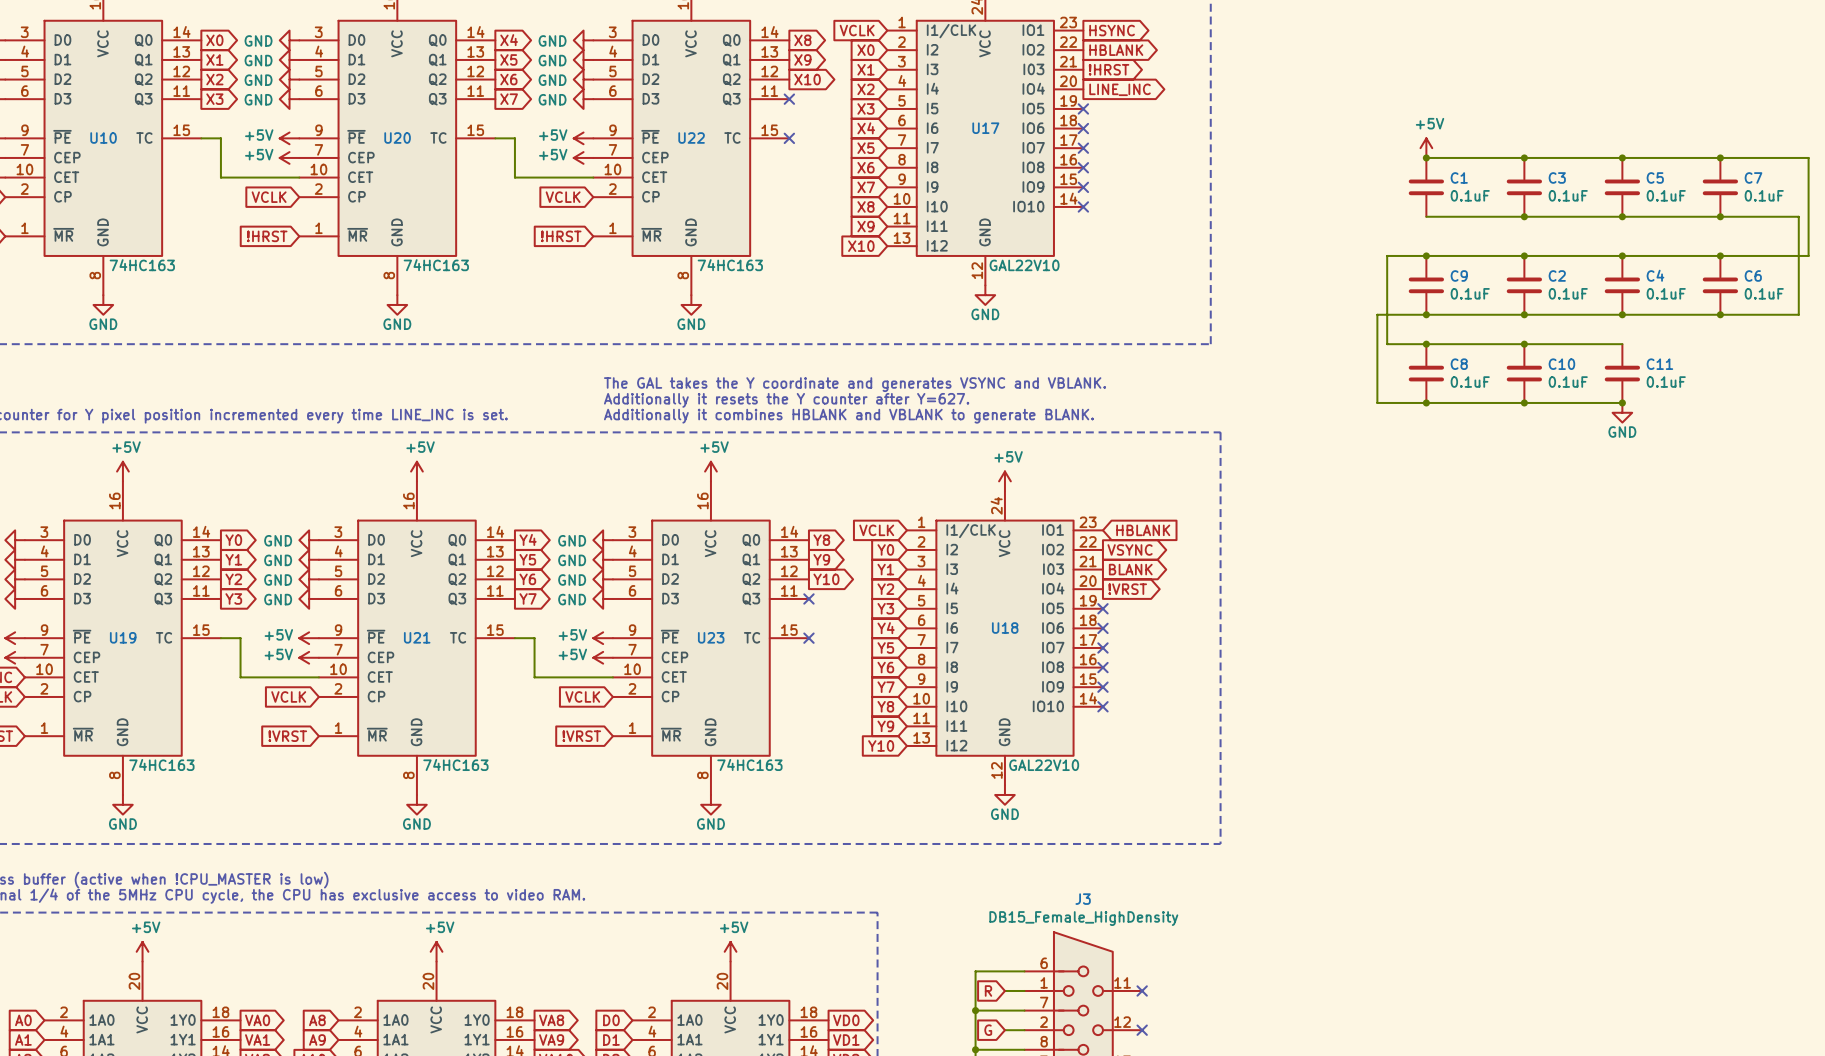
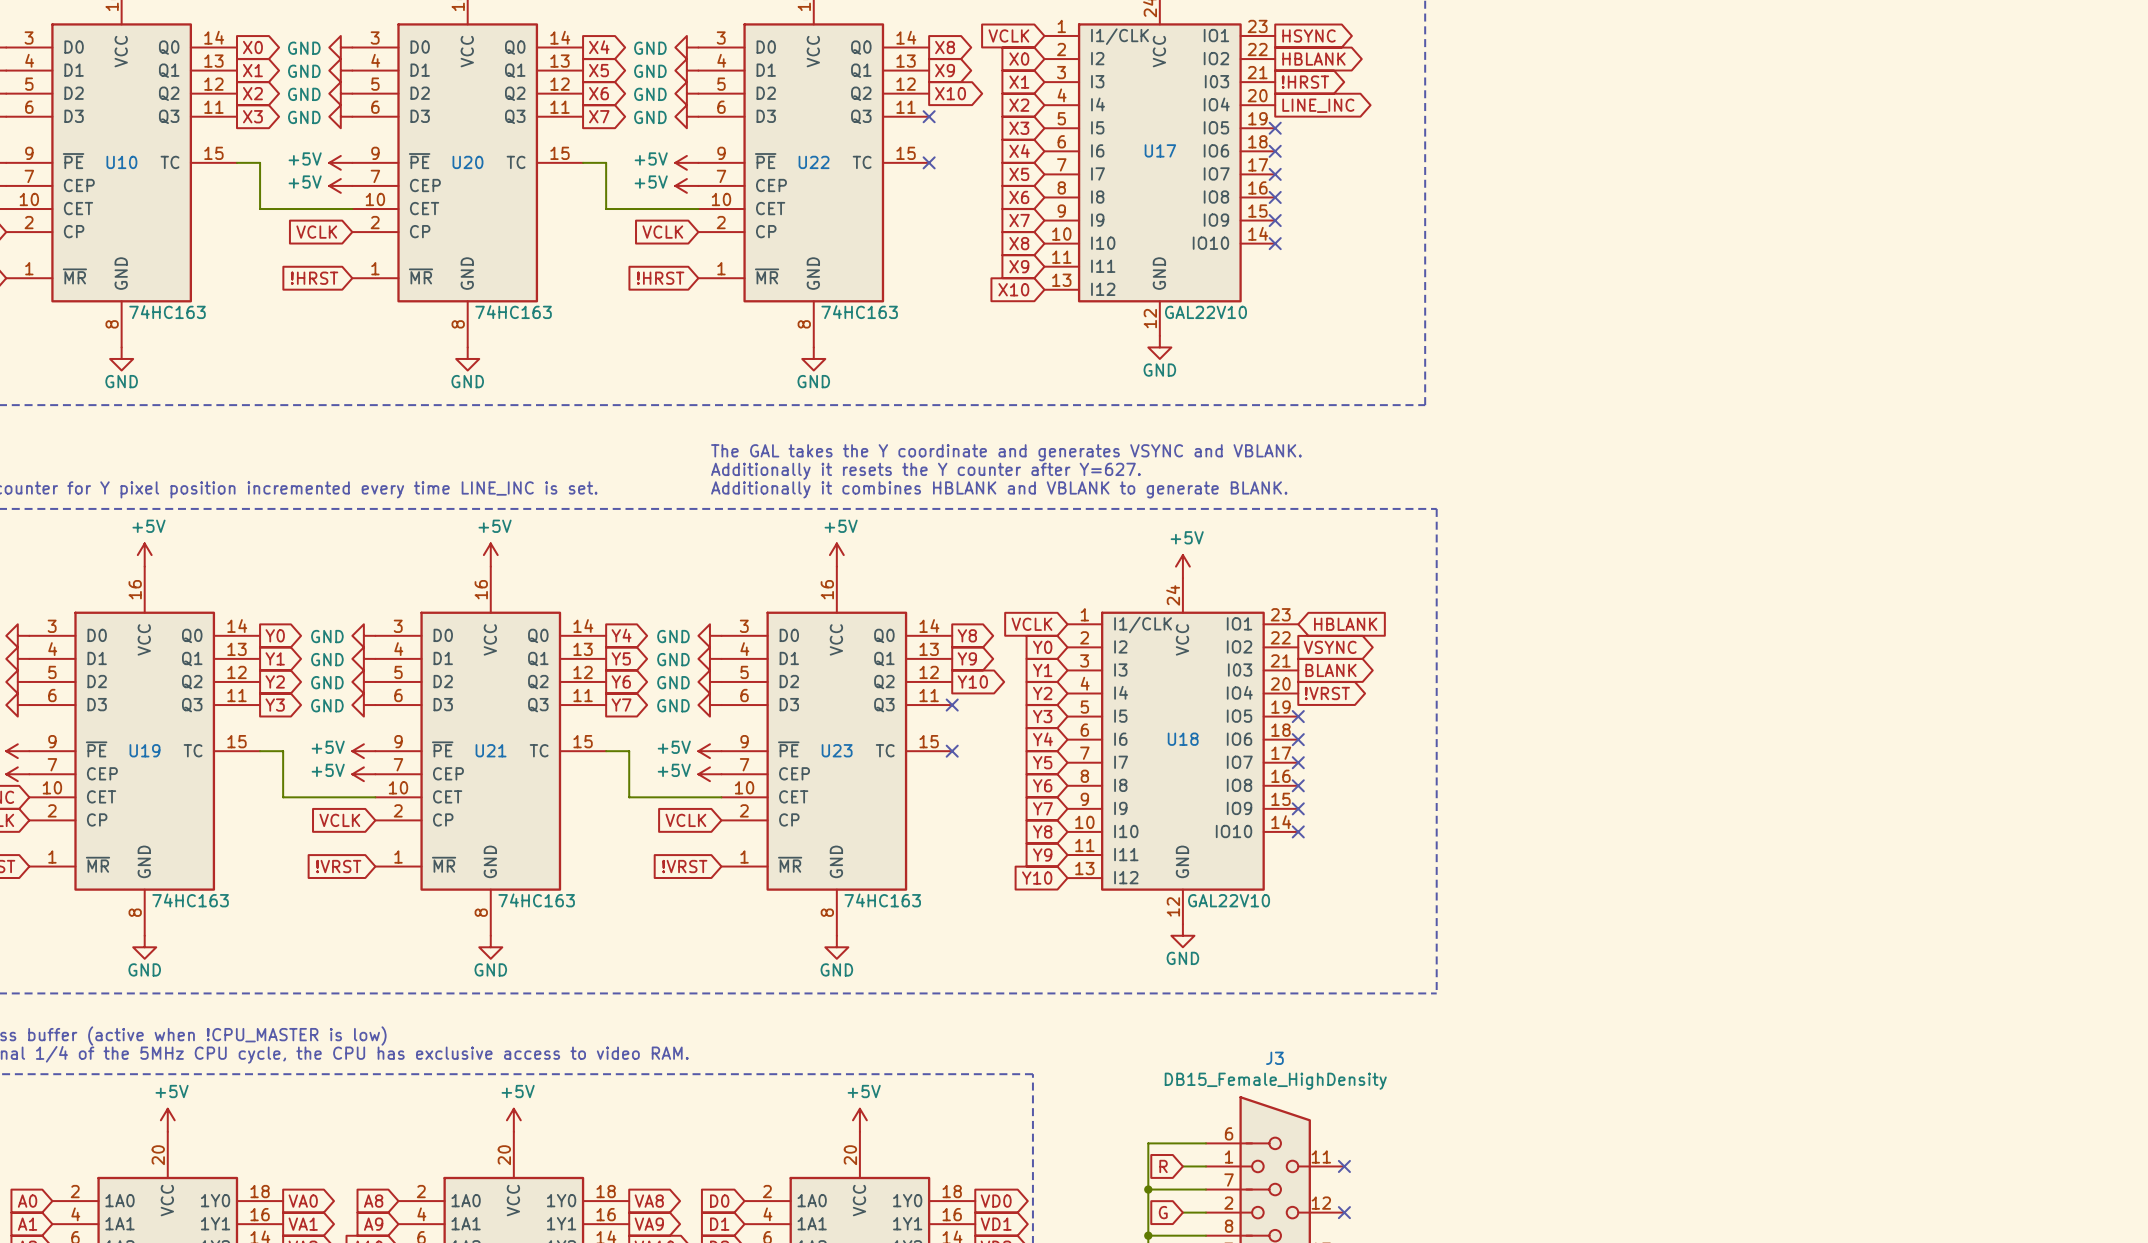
power symbol: +5V (1426, 148) -> none
wire: (1426, 157) (1808, 157) (1808, 255) (1387, 255) (1387, 344) (1622, 344) -> none
junction: (1426, 157) -> none
junction: (1524, 157) -> none
junction: (1622, 157) -> none
junction: (1720, 157) -> none
C1: 0.1uF (1426, 187) -> none
C3: 0.1uF (1524, 187) -> none
C5: 0.1uF (1622, 187) -> none
C7: 0.1uF (1720, 187) -> none
wire: (1426, 216) (1798, 216) (1798, 314) (1377, 314) (1377, 402) (1622, 402) -> none
junction: (1524, 216) -> none
junction: (1622, 216) -> none
junction: (1720, 216) -> none
junction: (1426, 255) -> none
junction: (1524, 255) -> none
junction: (1622, 255) -> none
junction: (1720, 255) -> none
C9: 0.1uF (1426, 285) -> none
C2: 0.1uF (1524, 285) -> none
C4: 0.1uF (1622, 285) -> none
C6: 0.1uF (1720, 285) -> none
junction: (1426, 314) -> none
junction: (1524, 314) -> none
junction: (1622, 314) -> none
junction: (1720, 314) -> none
junction: (1426, 344) -> none
junction: (1524, 344) -> none
C8: 0.1uF (1426, 373) -> none
C10: 0.1uF (1524, 373) -> none
C11: 0.1uF (1622, 373) -> none
junction: (1426, 402) -> none
junction: (1524, 402) -> none
junction: (1622, 402) -> none
power symbol: GND (1622, 412) -> none

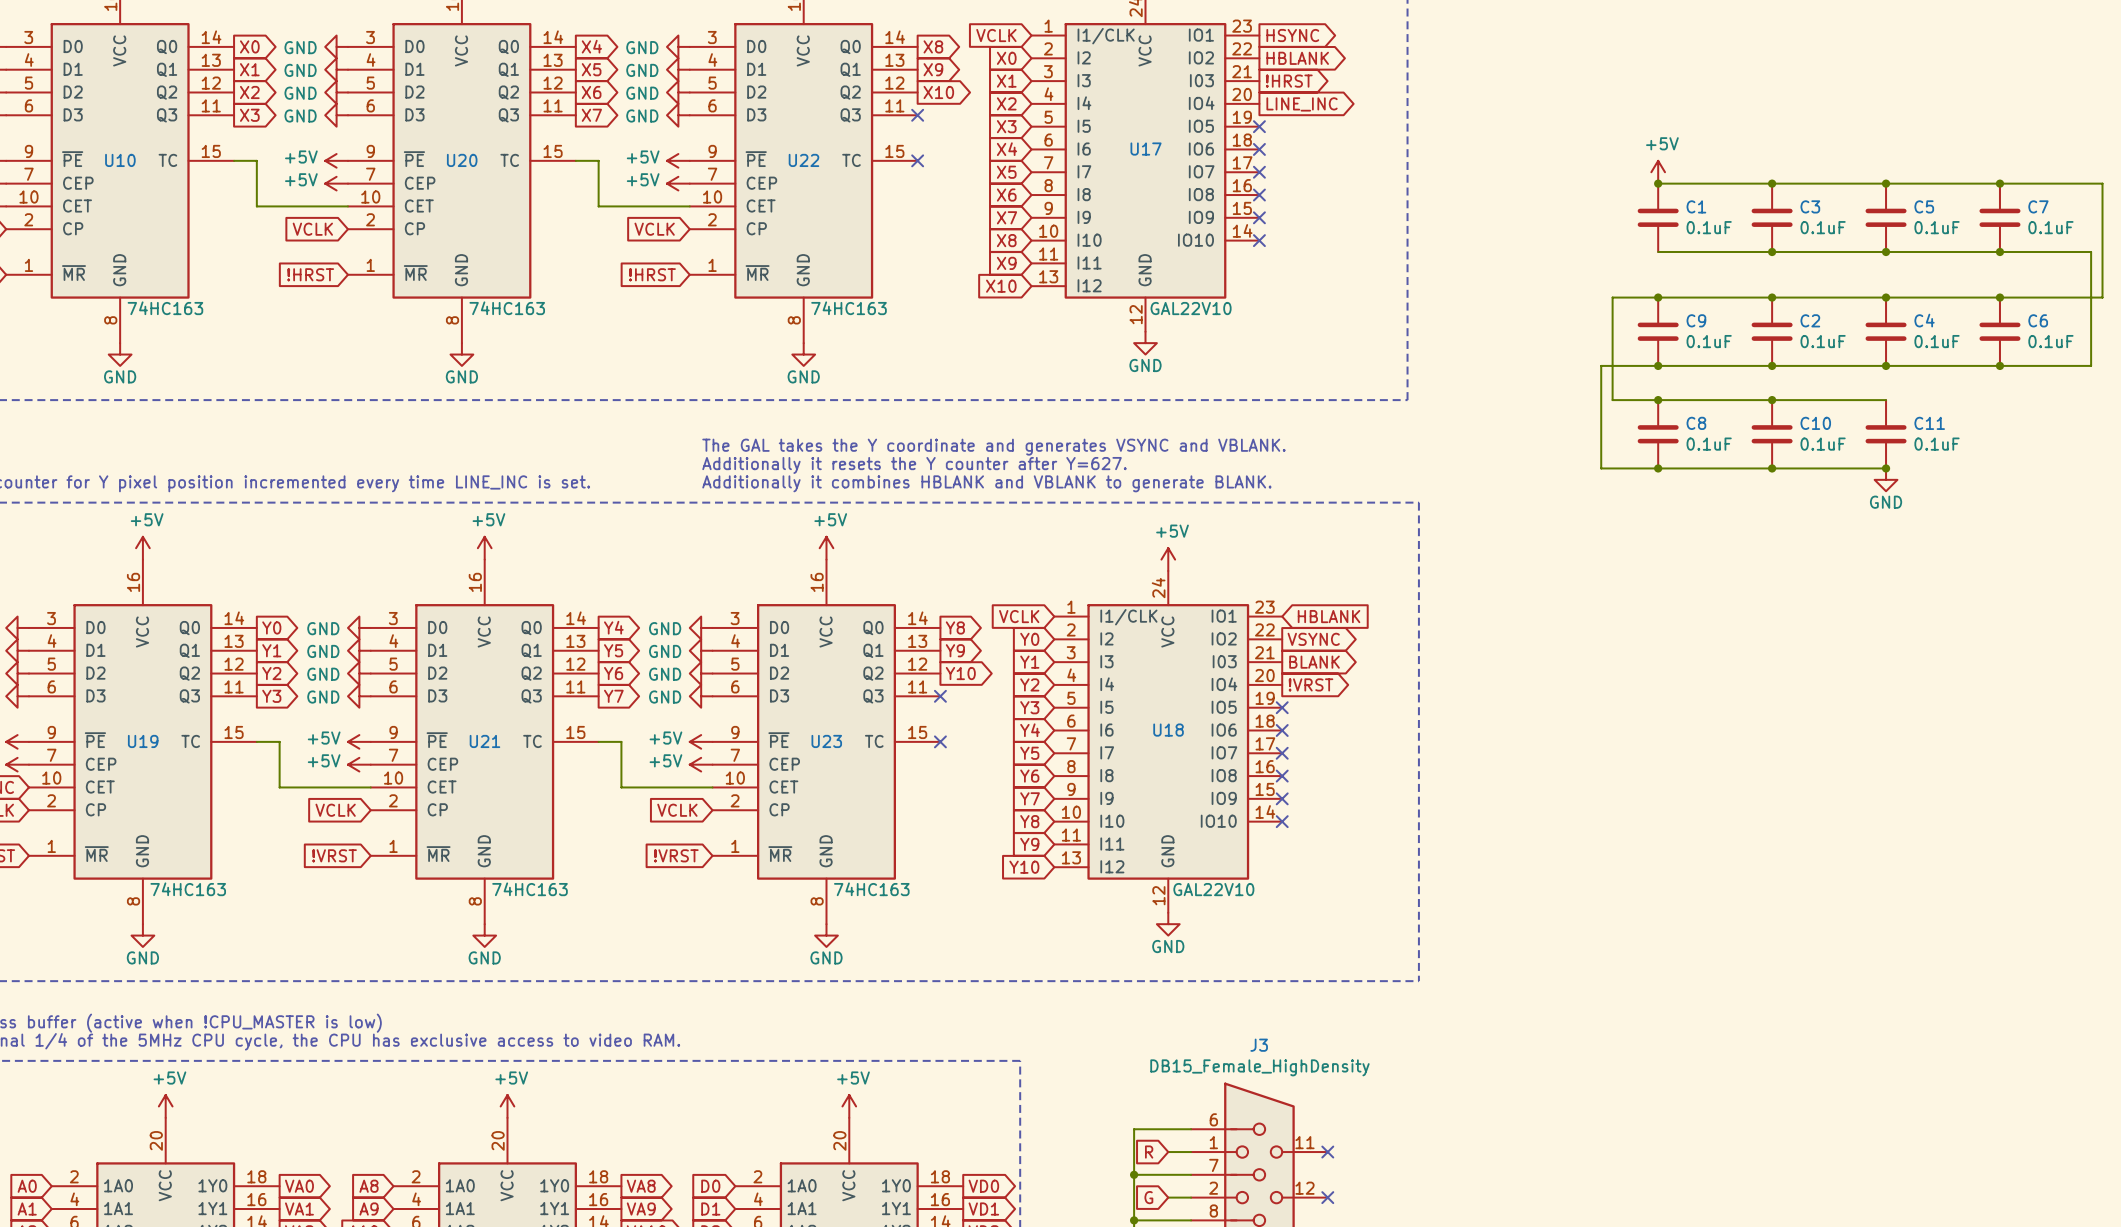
power symbol: none -> +5V (1658, 172)
wire: none -> (1658, 183) (2102, 183) (2102, 297) (1612, 297) (1612, 400) (1886, 400)
junction: none -> (1658, 183)
junction: none -> (1772, 183)
junction: none -> (1886, 183)
junction: none -> (1999, 183)
C1: none -> 0.1uF (1658, 217)
C3: none -> 0.1uF (1772, 217)
C5: none -> 0.1uF (1886, 217)
C7: none -> 0.1uF (1999, 217)
wire: none -> (1658, 251) (2091, 251) (2091, 365) (1601, 365) (1601, 468) (1886, 468)
junction: none -> (1772, 251)
junction: none -> (1886, 251)
junction: none -> (1999, 251)
junction: none -> (1658, 297)
junction: none -> (1772, 297)
junction: none -> (1886, 297)
junction: none -> (1999, 297)
C9: none -> 0.1uF (1658, 331)
C2: none -> 0.1uF (1772, 331)
C4: none -> 0.1uF (1886, 331)
C6: none -> 0.1uF (1999, 331)
junction: none -> (1658, 365)
junction: none -> (1772, 365)
junction: none -> (1886, 365)
junction: none -> (1999, 365)
junction: none -> (1658, 400)
junction: none -> (1772, 400)
C8: none -> 0.1uF (1658, 434)
C10: none -> 0.1uF (1772, 434)
C11: none -> 0.1uF (1886, 434)
junction: none -> (1658, 468)
junction: none -> (1772, 468)
junction: none -> (1886, 468)
power symbol: none -> GND (1886, 479)

